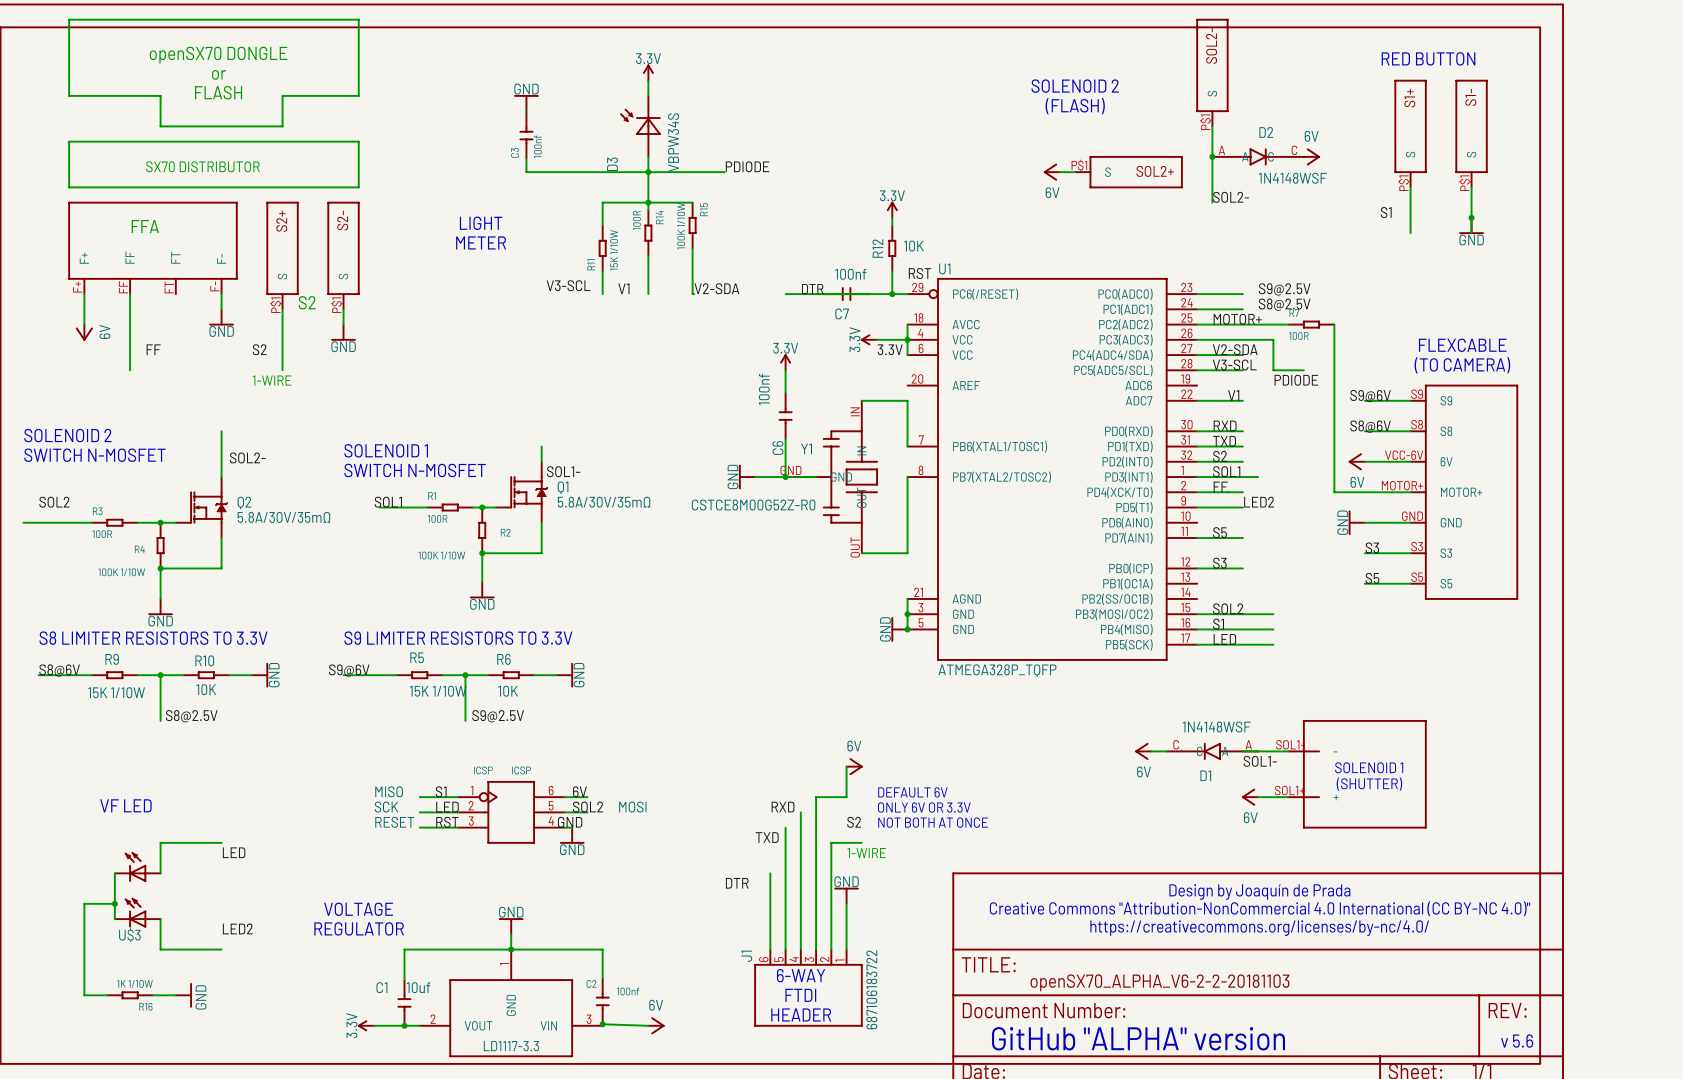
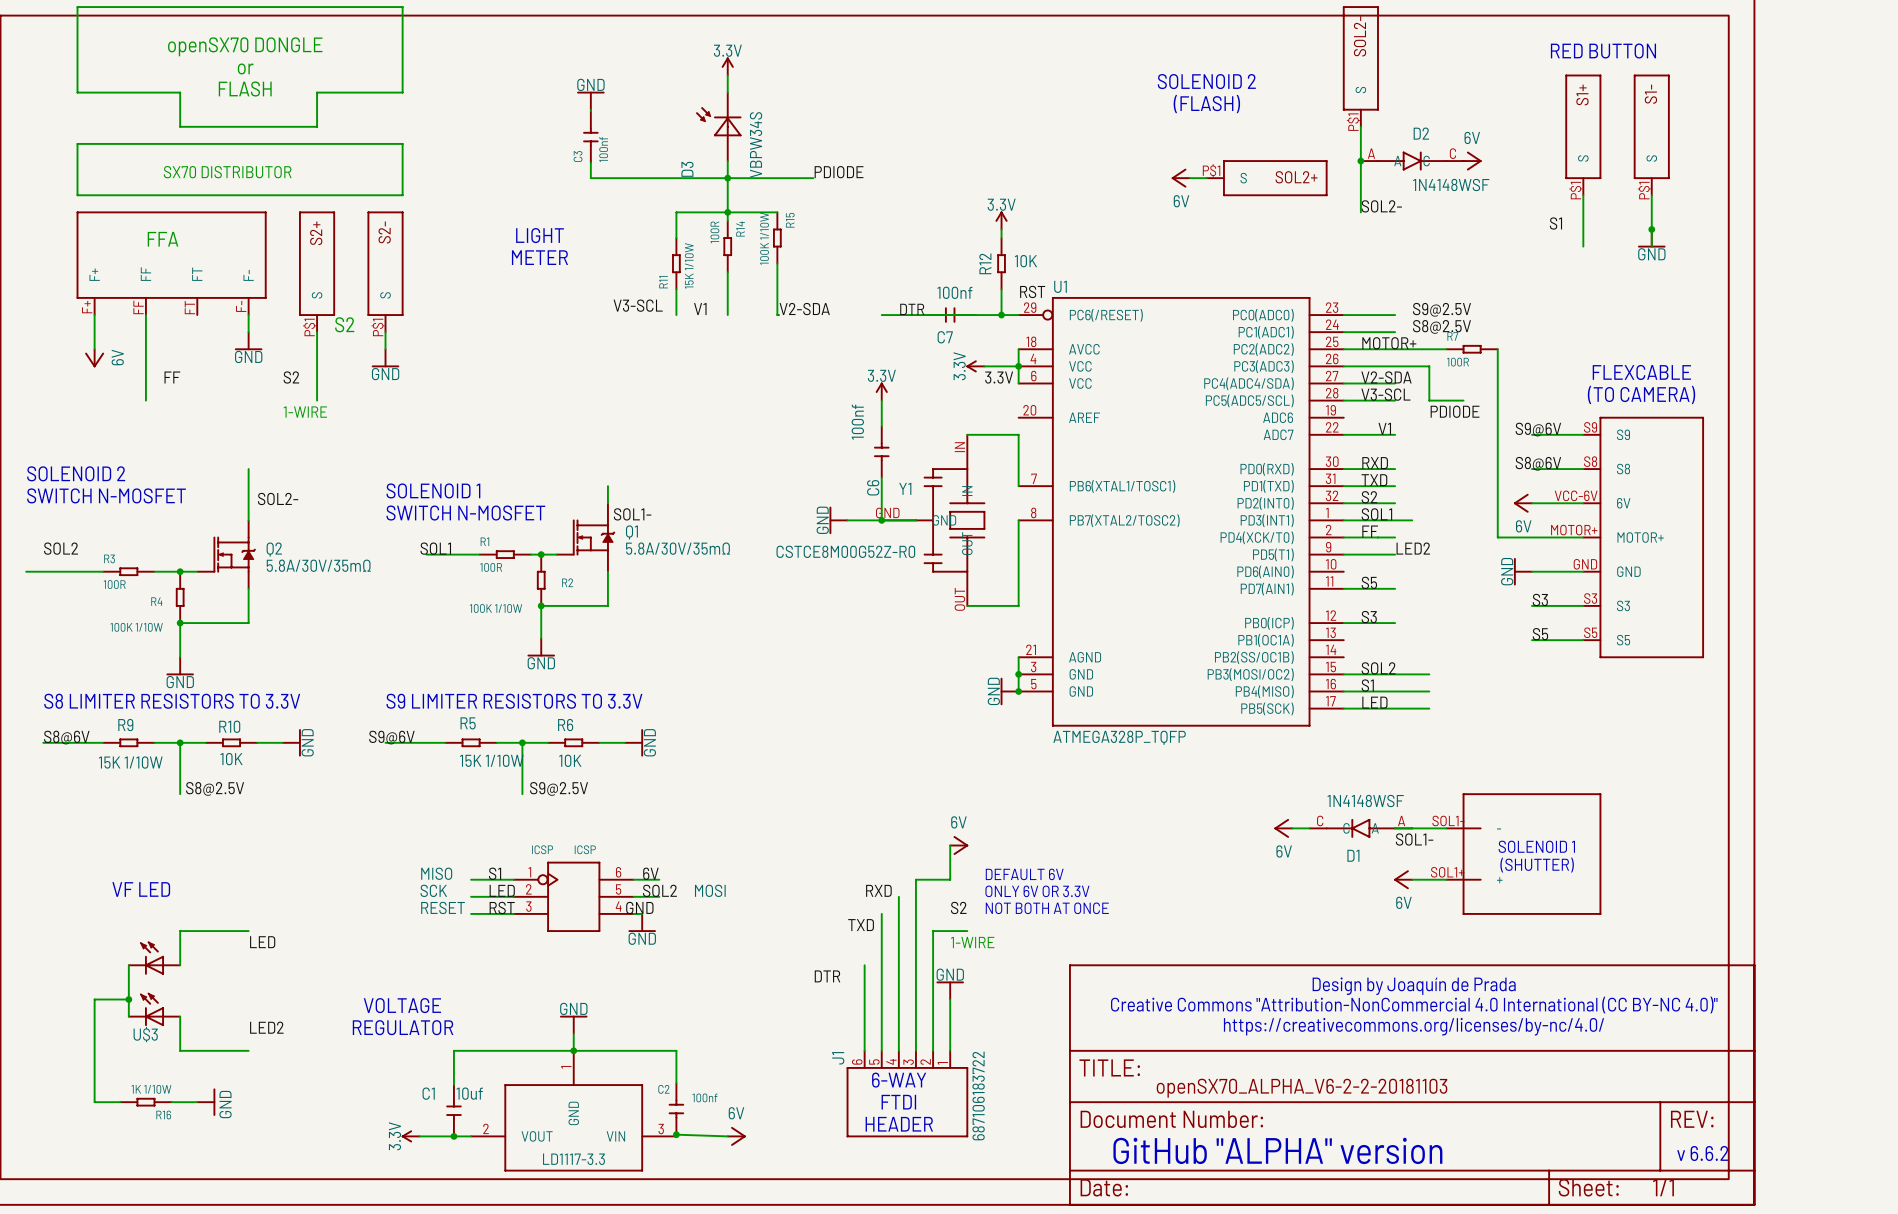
text: v 5.6 (1517, 1041) -> v 6.6.2 (1702, 1153)

